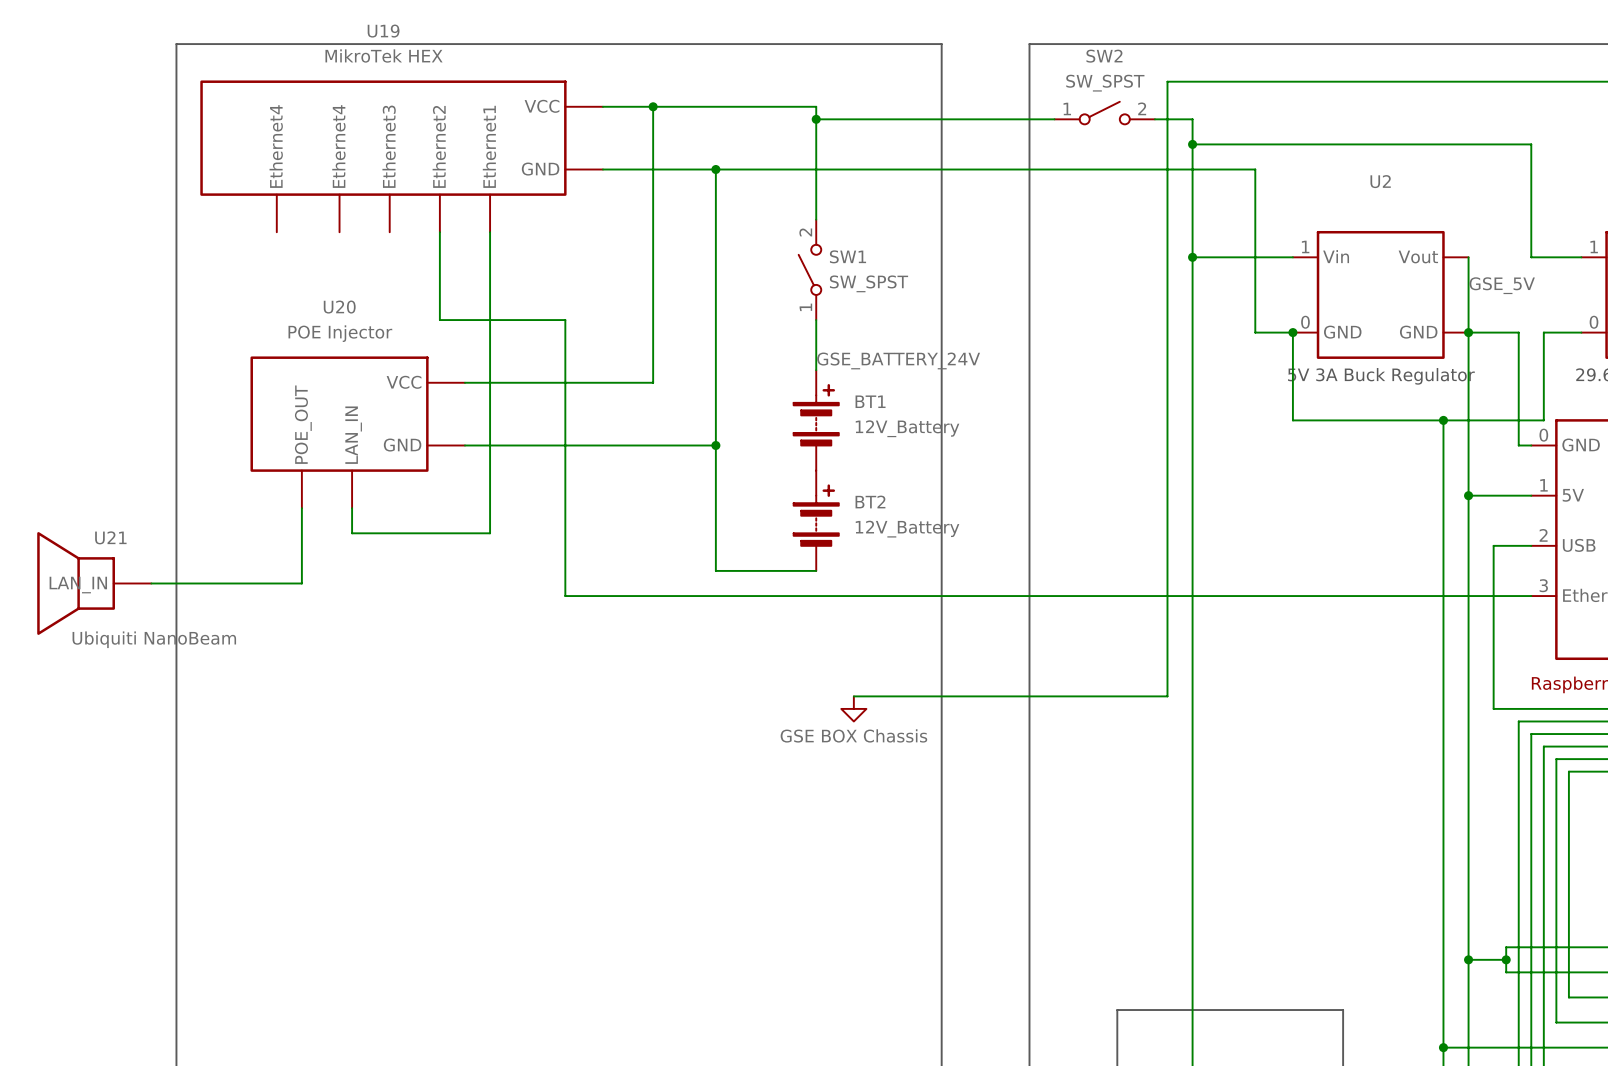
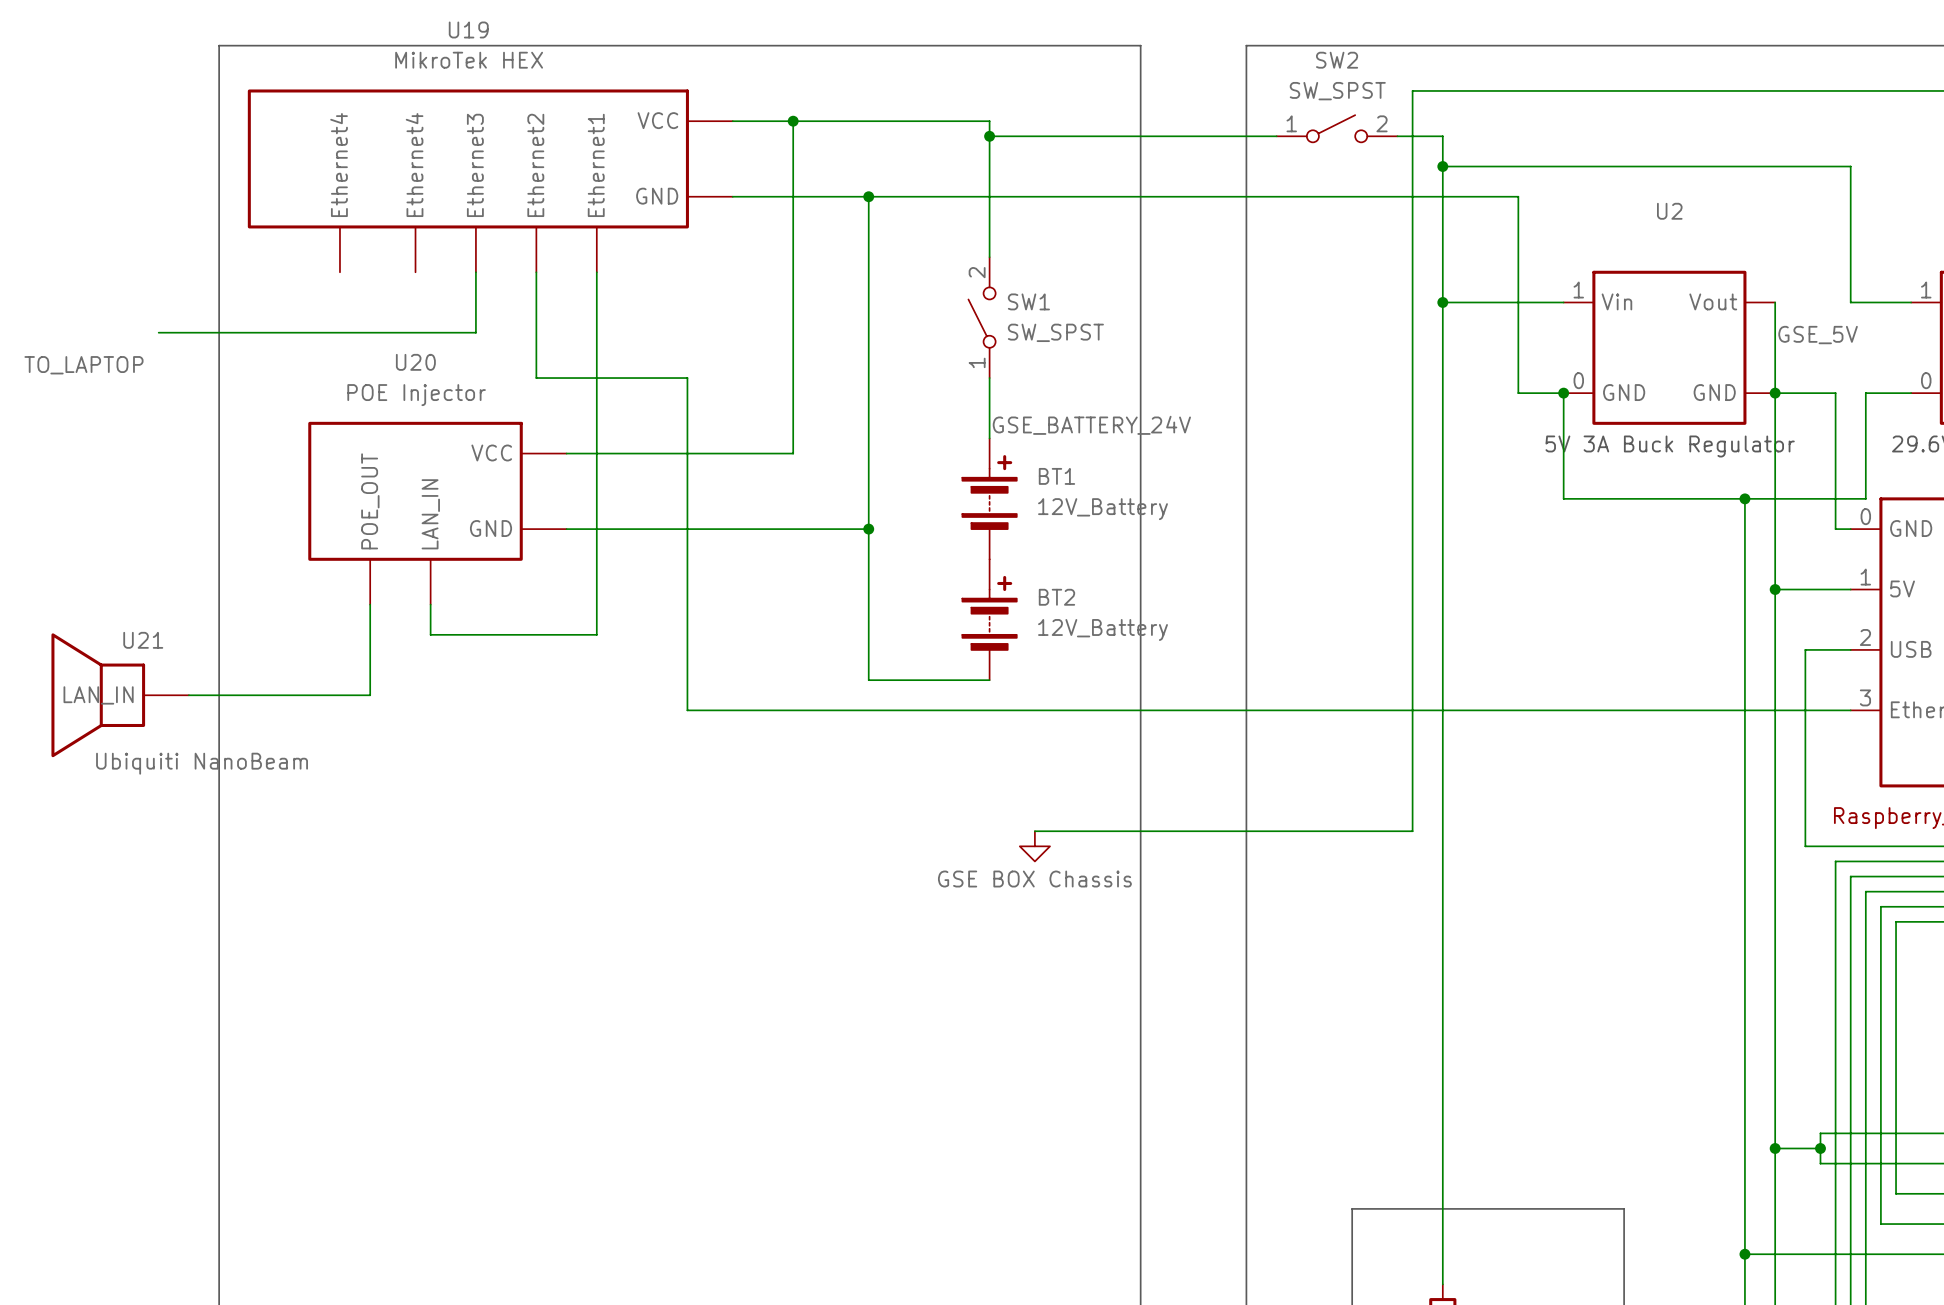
wire: none -> (475, 272) (475, 332) (158, 332)
label: none -> TO_LAPTOP (83, 365)

